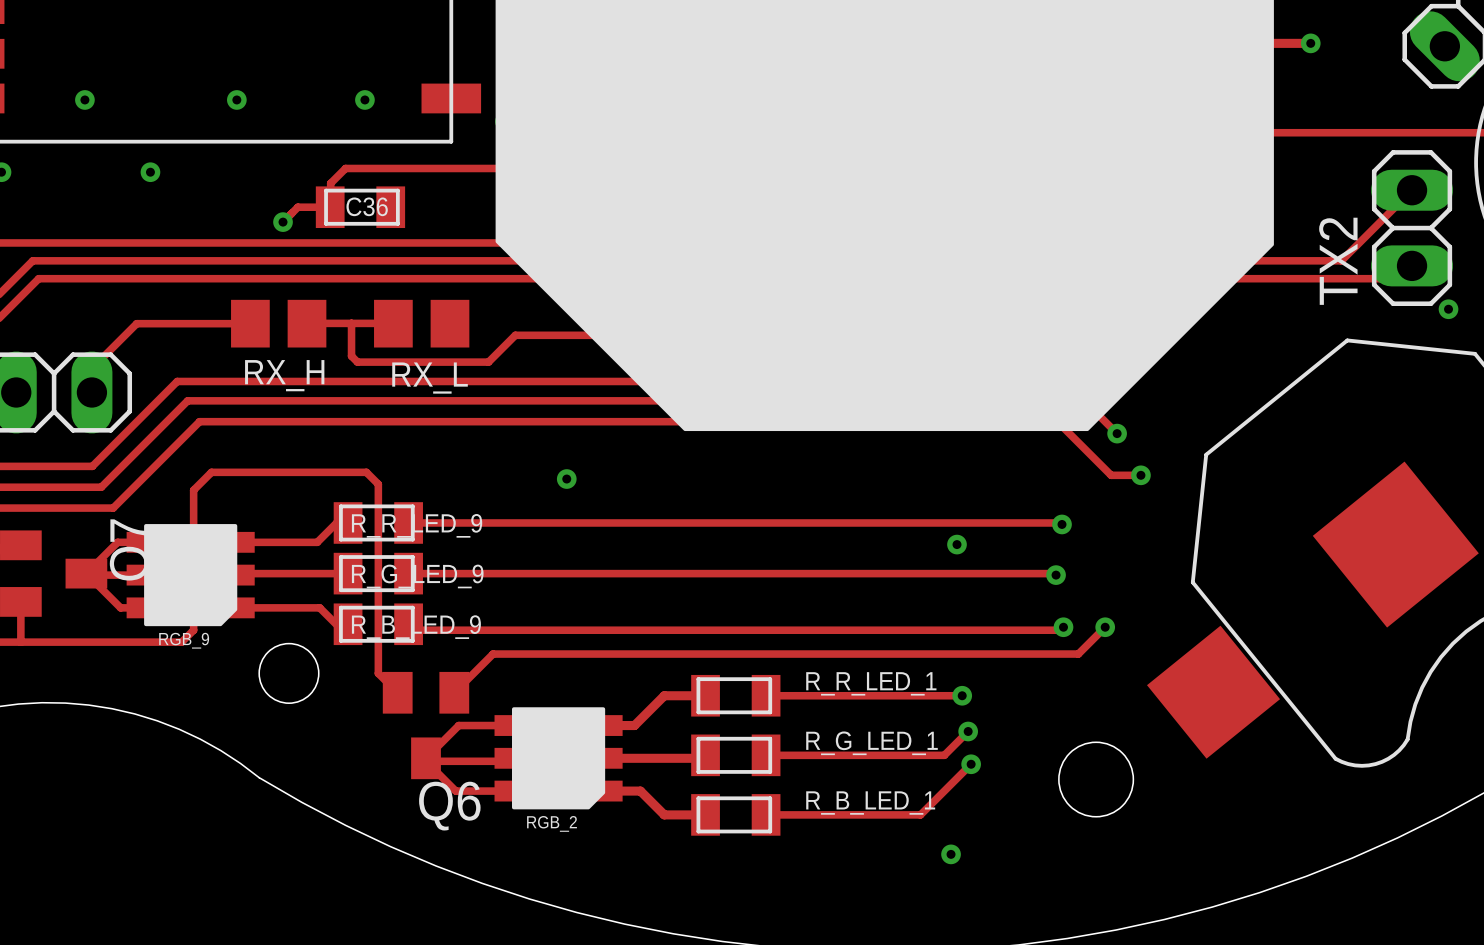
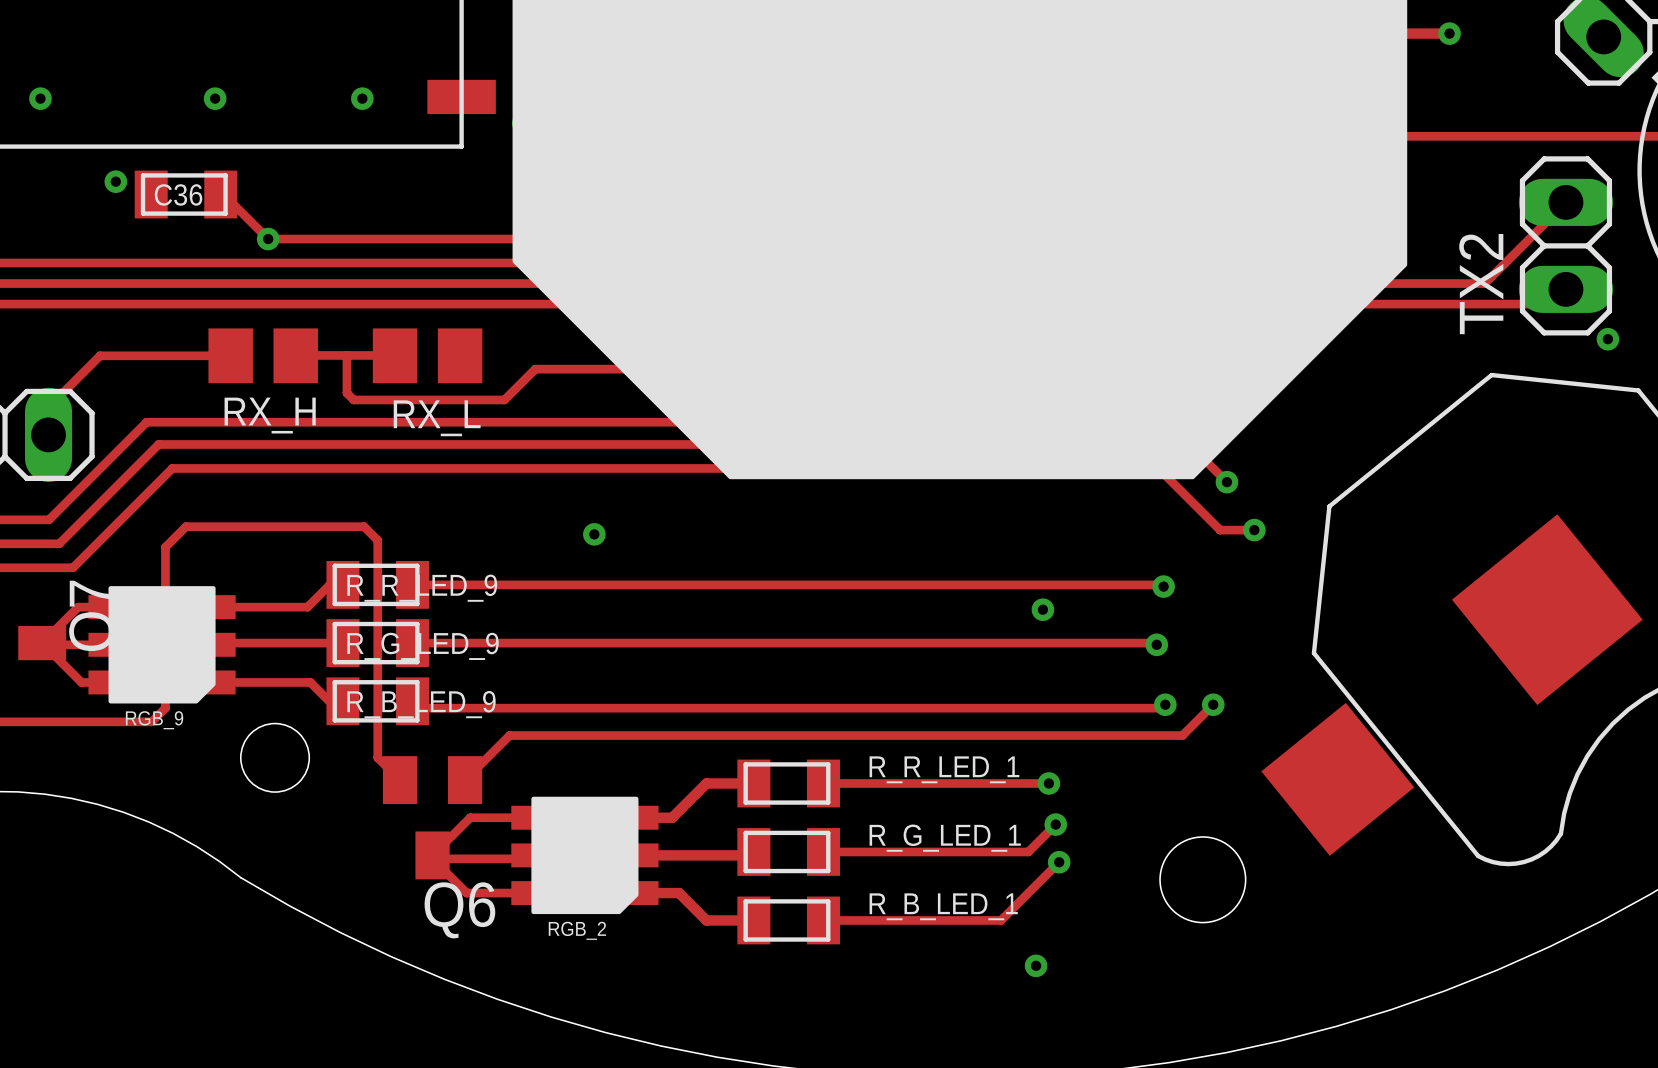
track: (539, 159) (530, 168) (345, 168) (330, 183) (330, 210) (330, 207) (297, 207) (283, 222) -> (562, 167) (562, 221) (545, 239) (268, 239) (223, 194) (220, 194)
C36 rotation: 0° (360, 207) -> 180° (186, 194)
C36 position: (360, 207) -> (186, 194)

